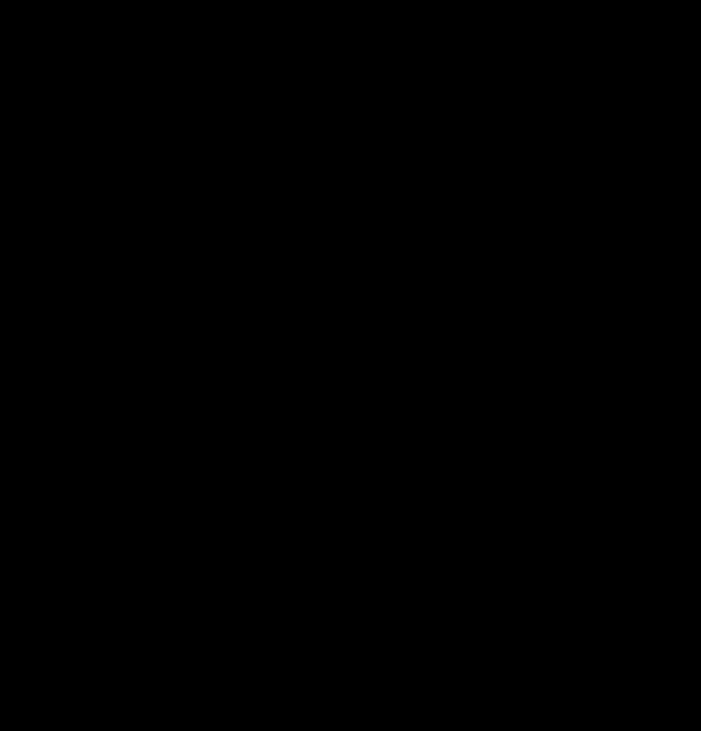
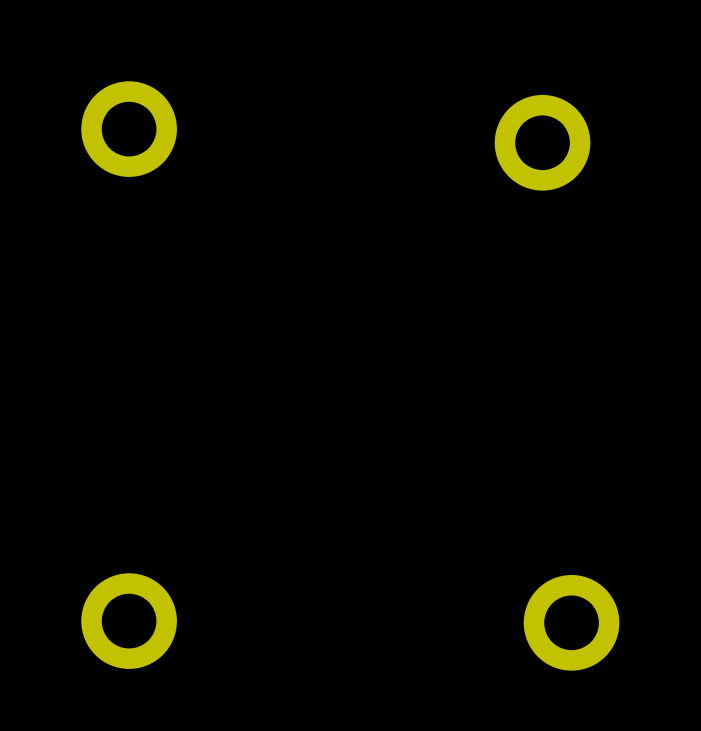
part: none -> (129, 129)
part: none -> (542, 142)
part: none -> (129, 621)
part: none -> (571, 622)

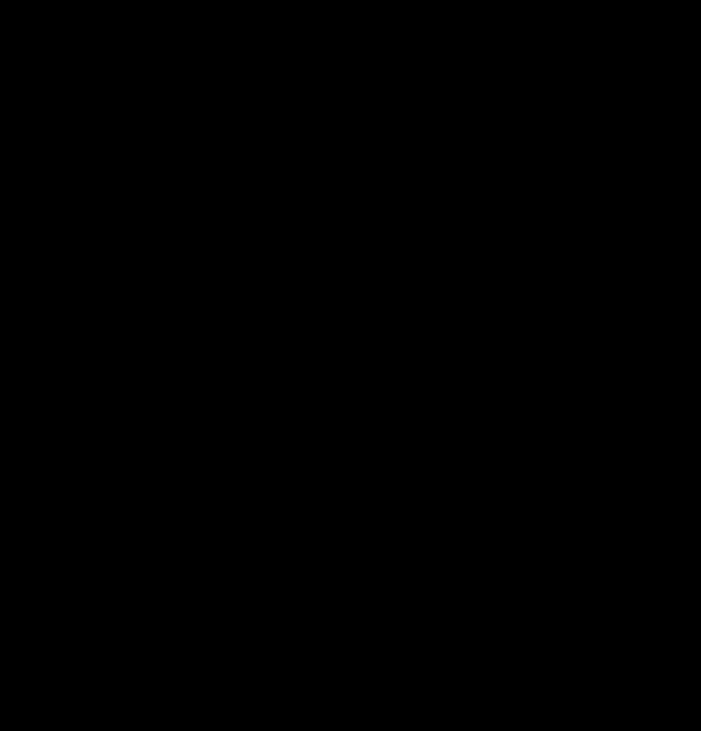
part: (129, 129) -> none
part: (542, 142) -> none
part: (129, 621) -> none
part: (571, 622) -> none

